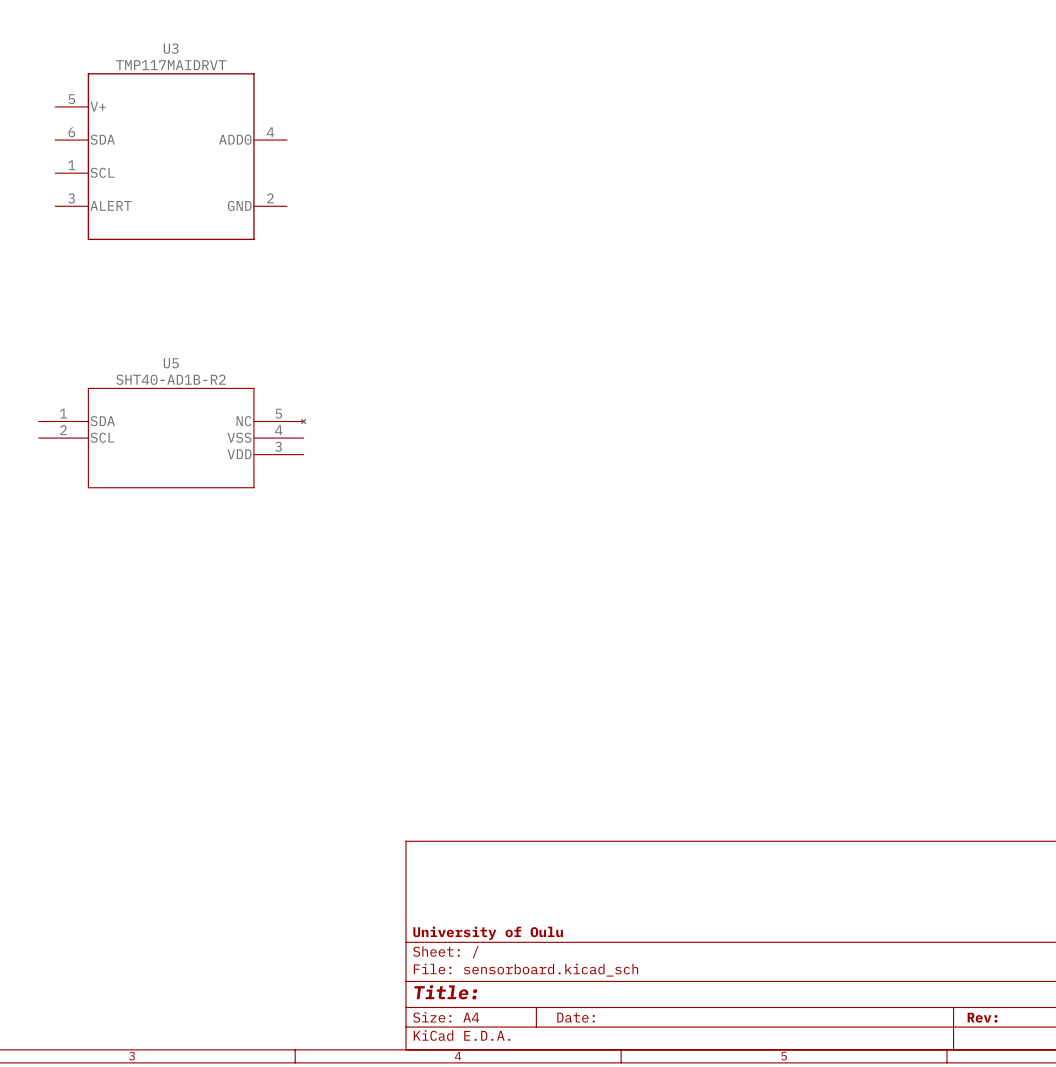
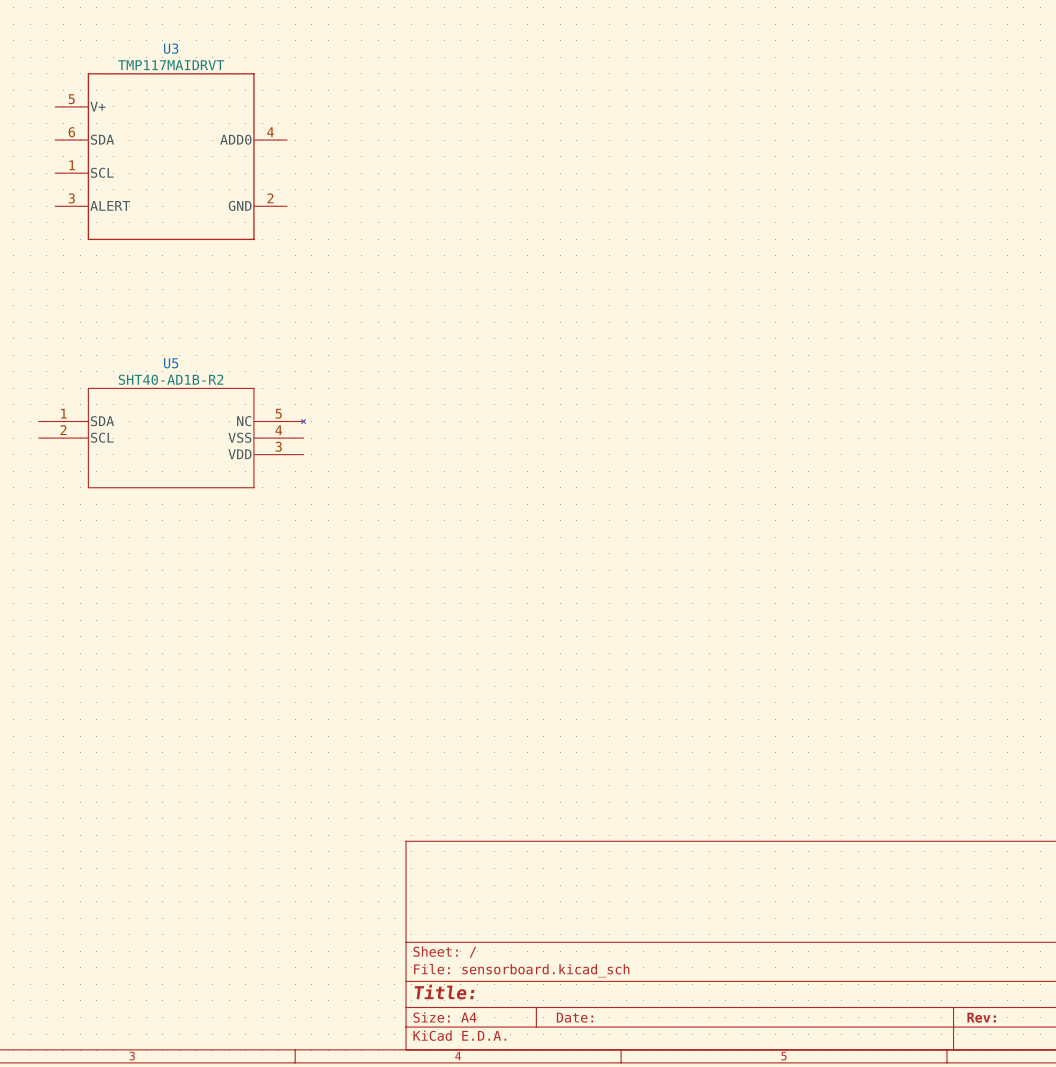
title block: University of Oulu (488, 933) -> none

